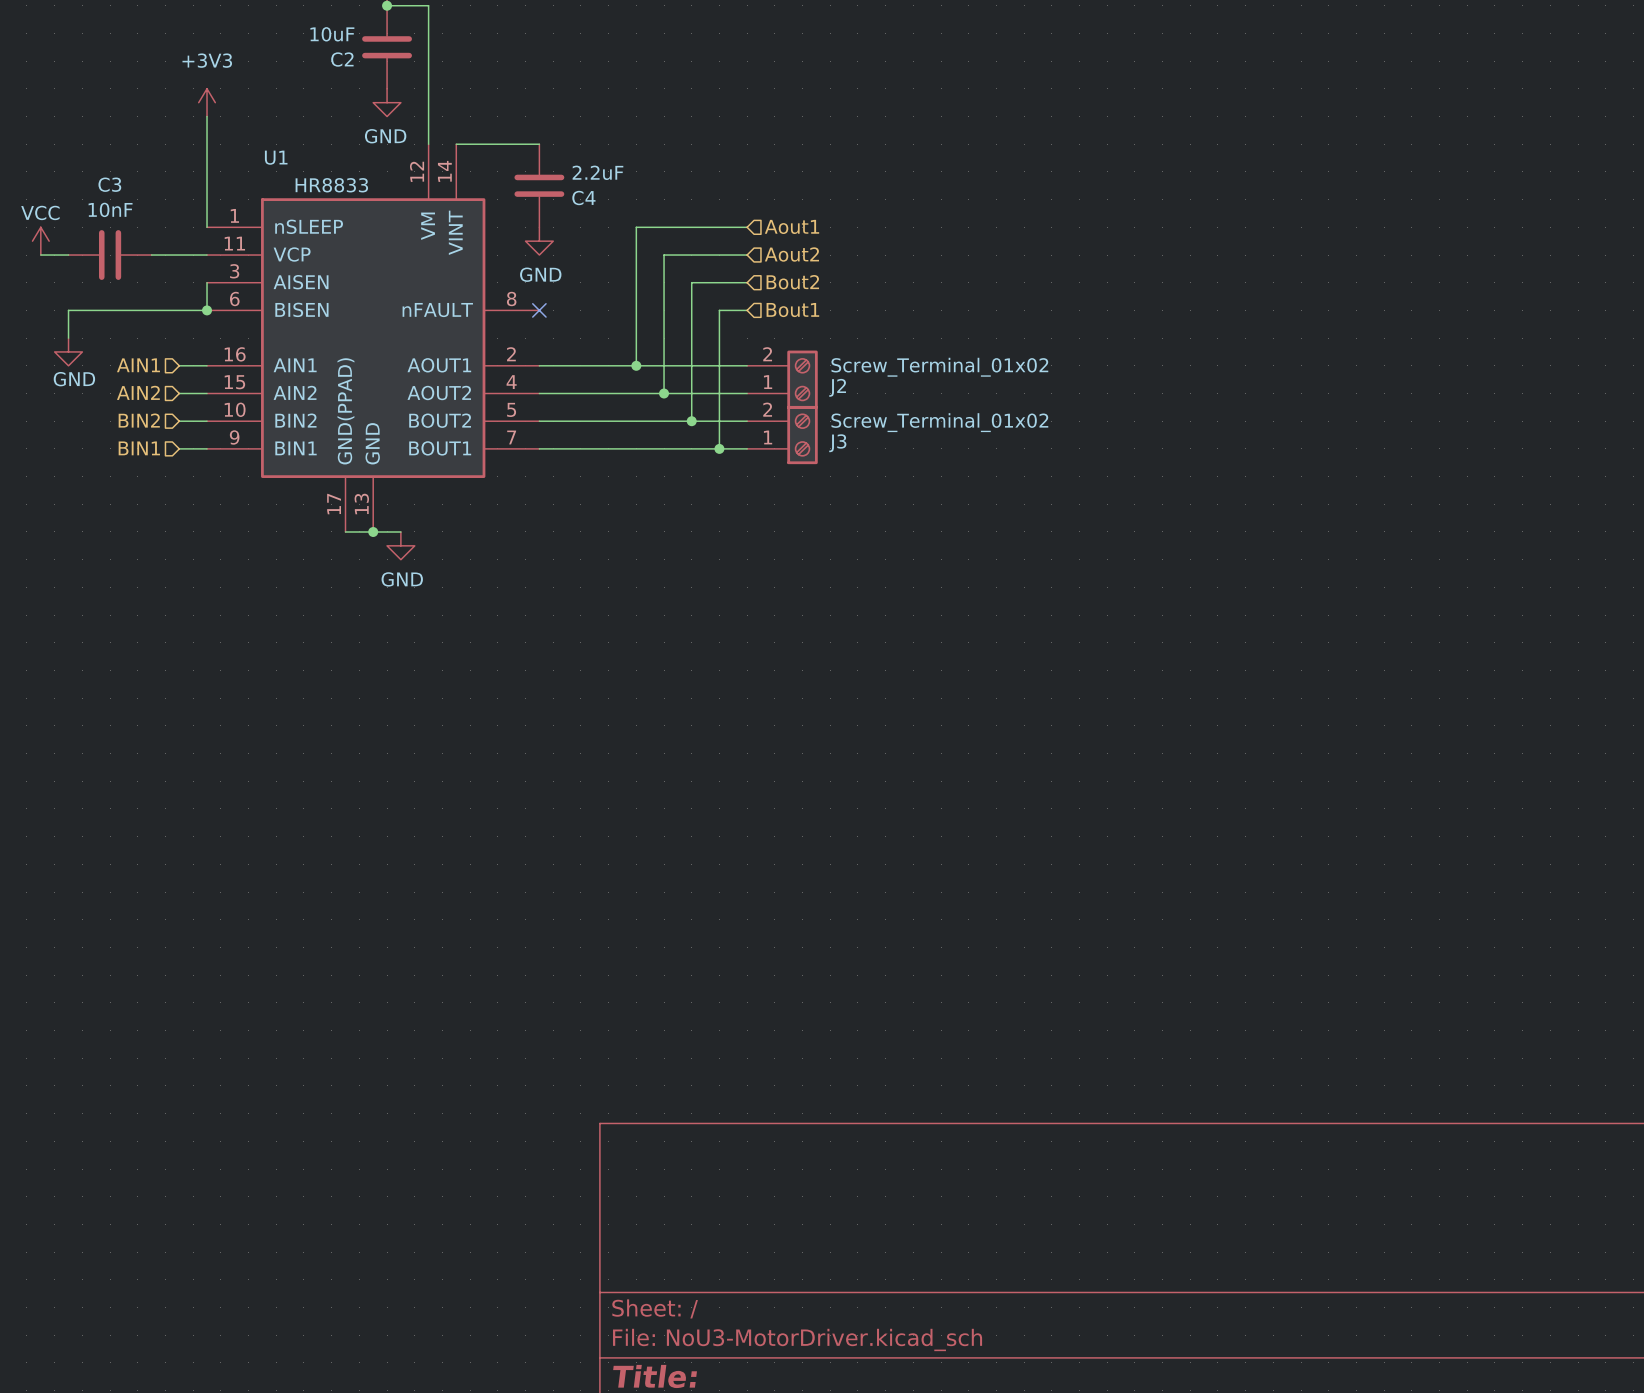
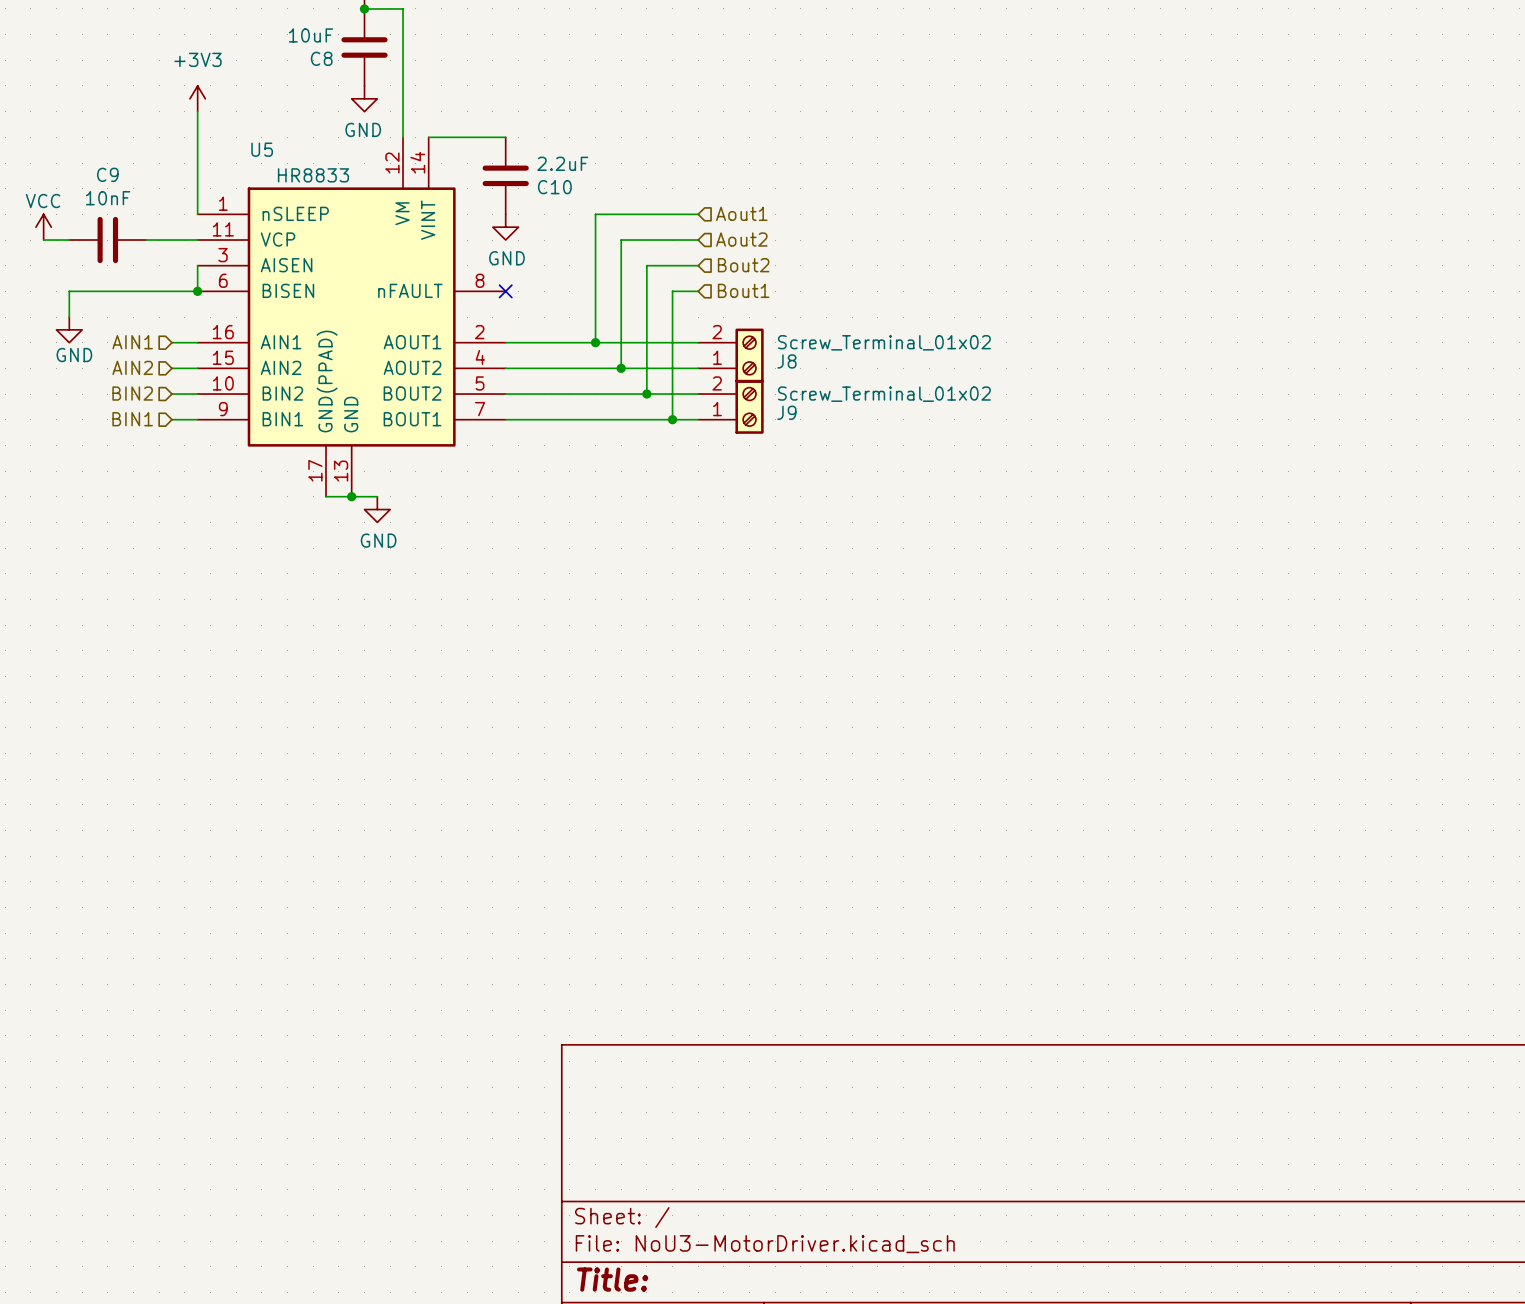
C2 name: C2 (342, 59) -> C8 (321, 58)
U1 name: U1 (276, 157) -> U5 (262, 149)
C3 name: C3 (109, 184) -> C9 (107, 174)
C4 name: C4 (583, 198) -> C10 (554, 187)
J2 name: J2 (837, 387) -> J8 (786, 361)
J3 name: J3 (837, 443) -> J9 (786, 412)

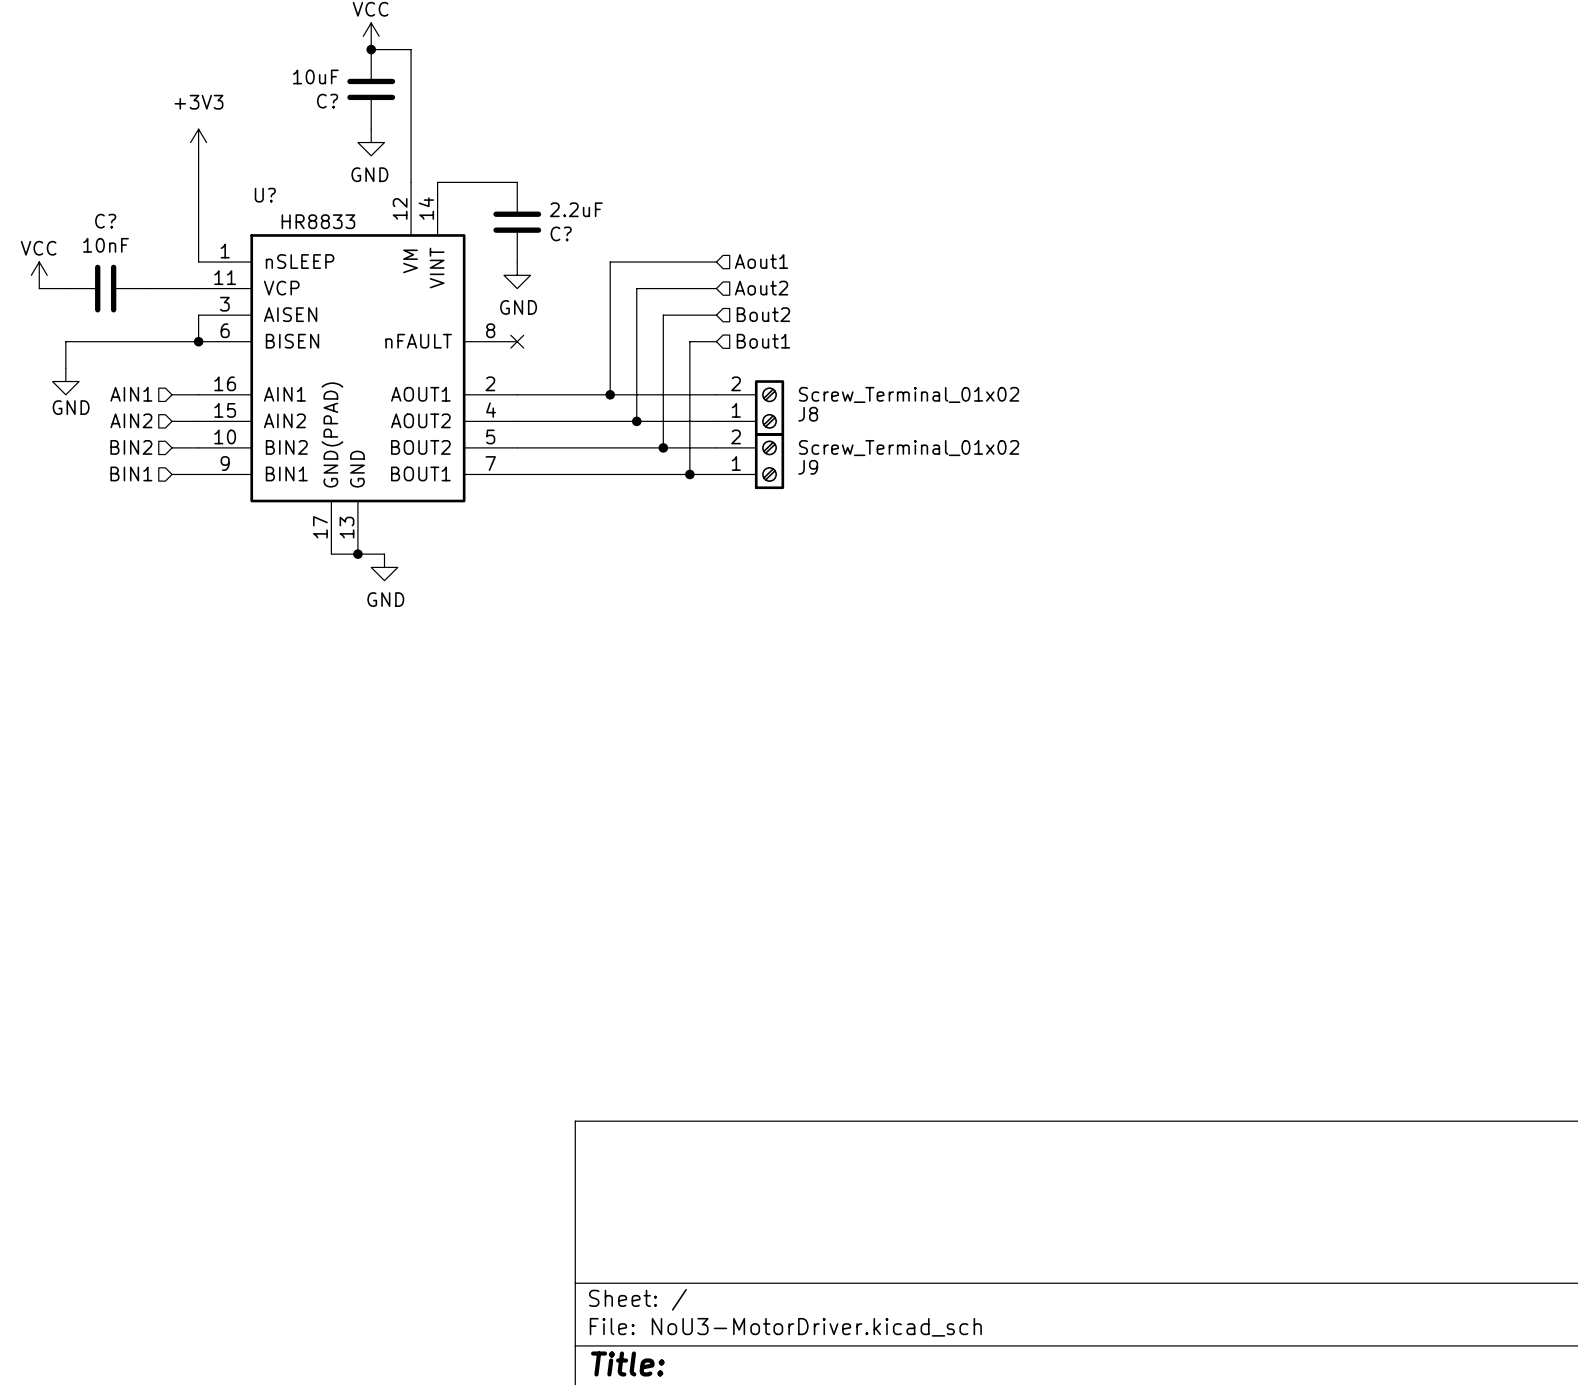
C8 name: C8 (321, 58) -> C? (327, 101)
U5 name: U5 (262, 149) -> U? (265, 195)
C9 name: C9 (107, 174) -> C? (105, 221)
C10 name: C10 (554, 187) -> C? (561, 233)

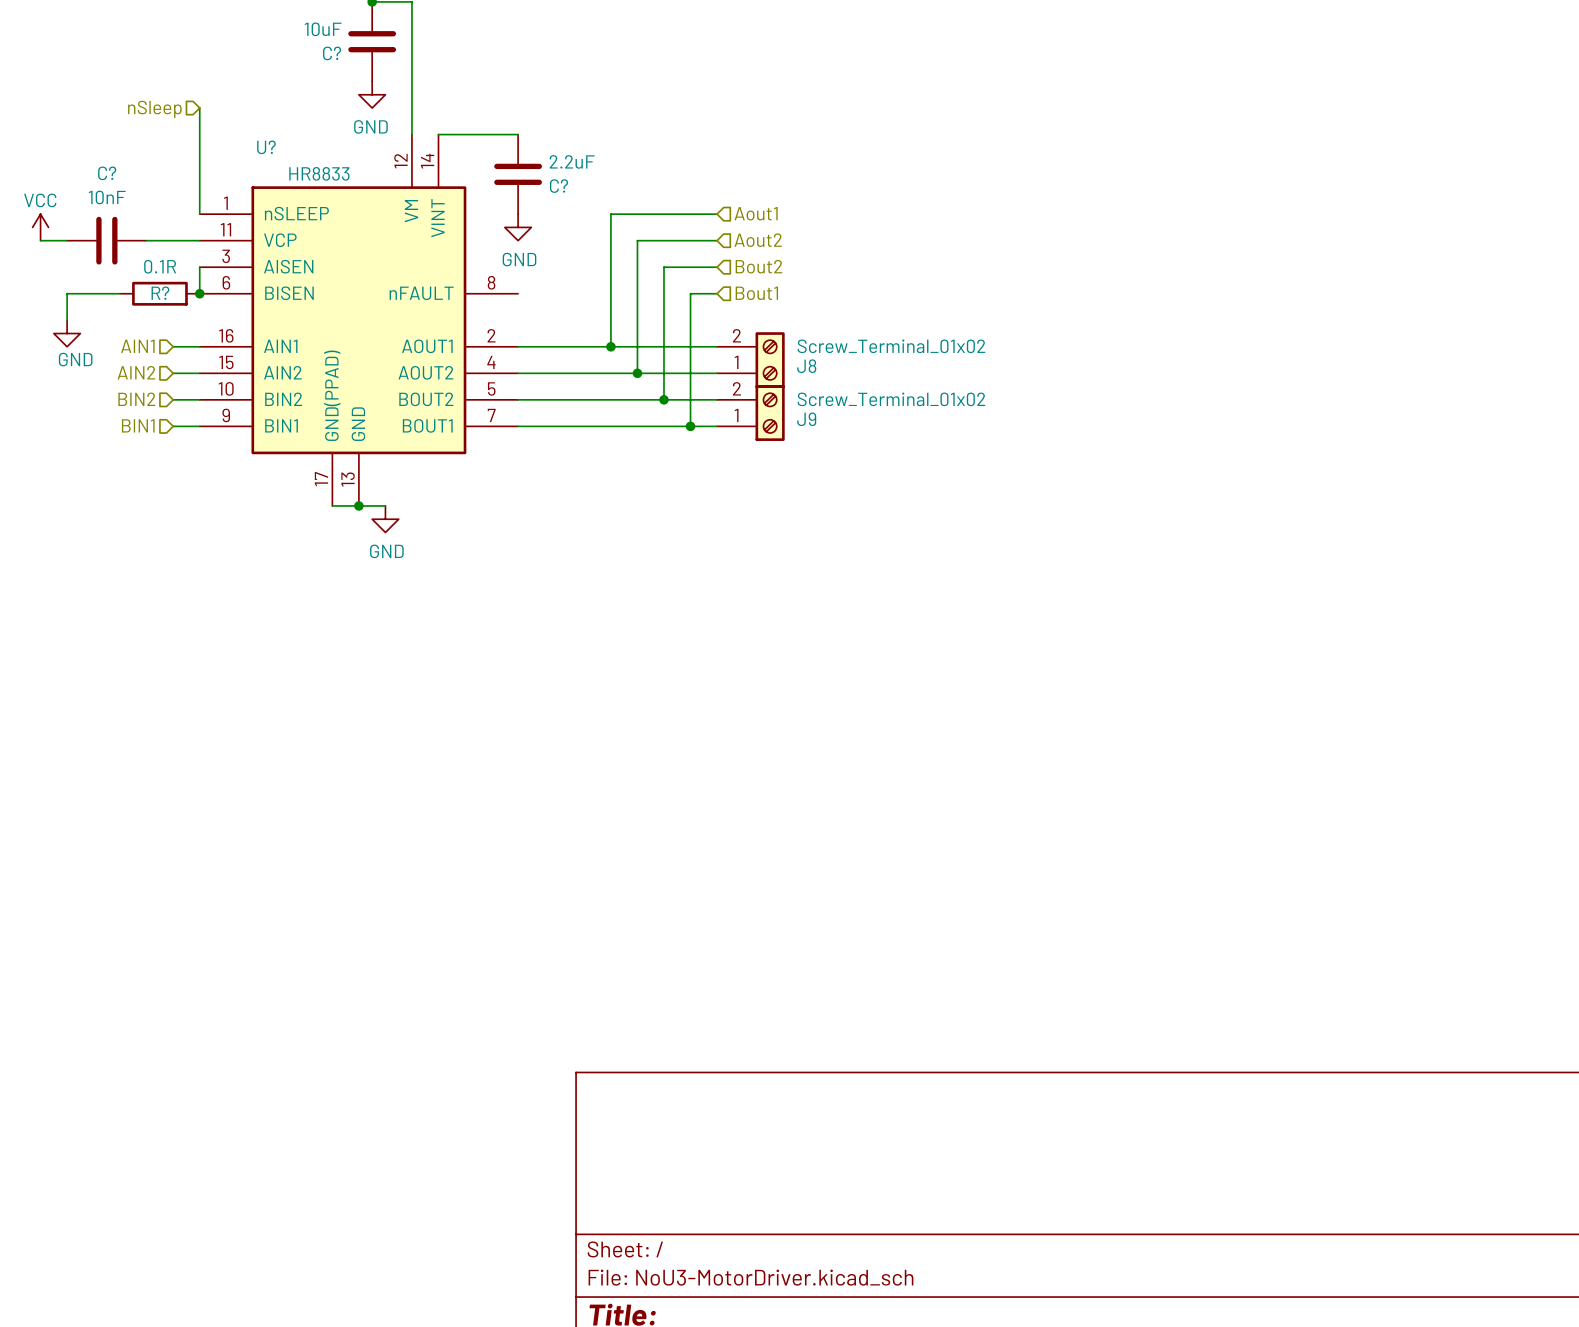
power symbol: +3V3 (198, 142) -> none
hierarchical label: none -> nSleep (154, 109)
wire: (118, 341) (198, 341) -> none
R?: none -> 0.1R (159, 293)
no-connect mark: (517, 341) -> none

